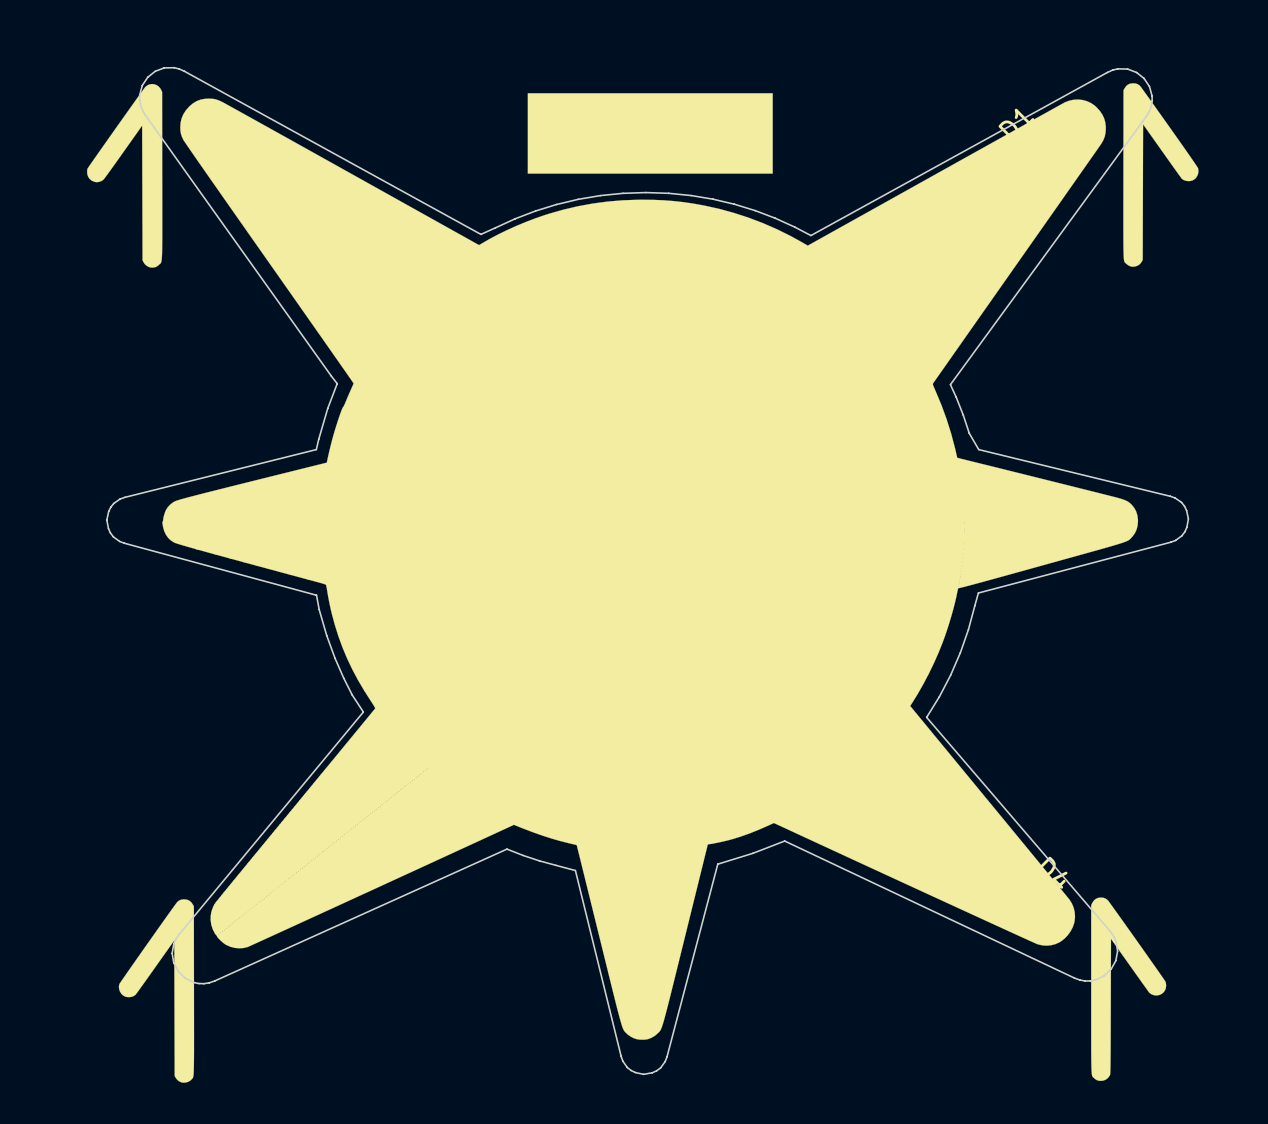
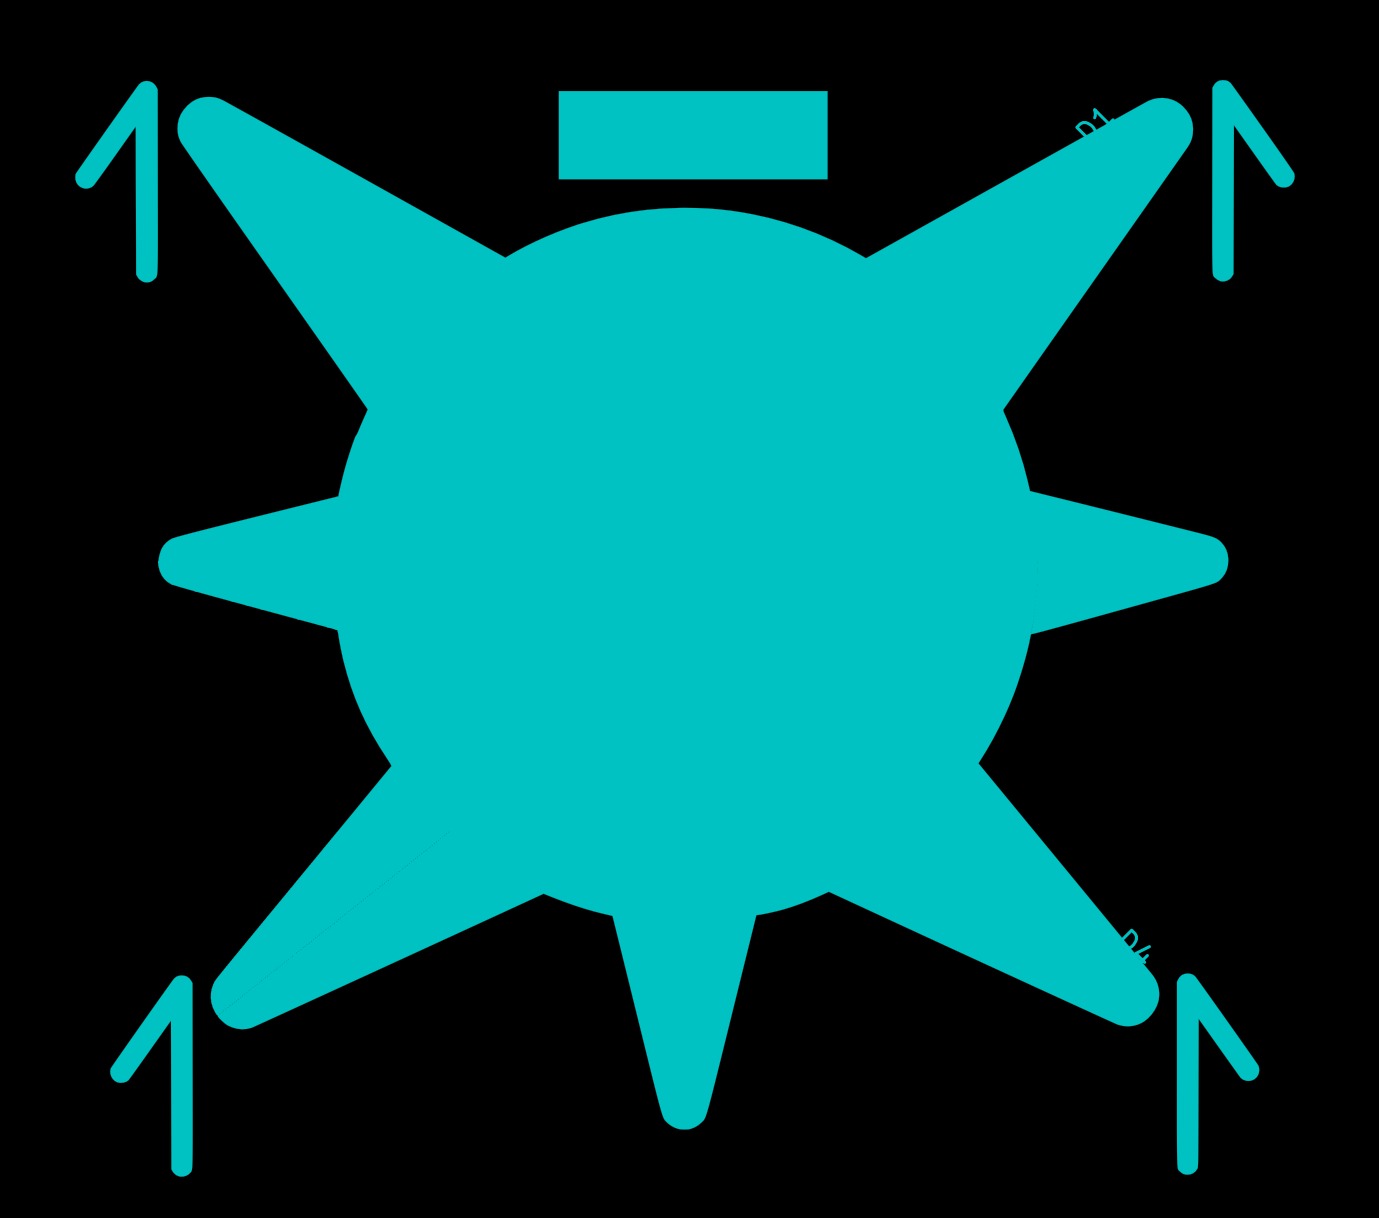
board edge: (174, 67) (164, 67) (147, 77) (142, 85) (139, 94) (142, 110) (337, 383) (327, 408) (316, 449) (120, 499) (113, 503) (108, 511) (106, 520) (108, 528) (113, 536) (124, 543) (316, 595) (326, 635) (335, 658) (352, 695) (363, 712) (176, 938) (172, 953) (173, 962) (185, 978) (198, 983) (214, 980) (506, 849) (539, 860) (575, 870) (622, 1061) (627, 1067) (635, 1072) (643, 1074) (652, 1072) (660, 1067) (667, 1056) (717, 864) (784, 841) (1074, 978) (1085, 981) (1095, 980) (1104, 975) (1111, 969) (1117, 951) (1116, 941) (1110, 931) (926, 717) (950, 675) (960, 652) (978, 593) (1170, 542) (1181, 535) (1186, 527) (1188, 518) (1186, 510) (1181, 502) (1175, 497) (978, 449) (969, 433) (950, 384) (1146, 116) (1151, 106) (1152, 96) (1149, 86) (1144, 78) (1127, 69) (1117, 68) (1107, 72) (810, 235) (775, 218) (734, 204) (691, 195) (645, 192) (600, 195) (556, 204) (515, 218) (480, 234) (184, 71) (174, 67) -> none

